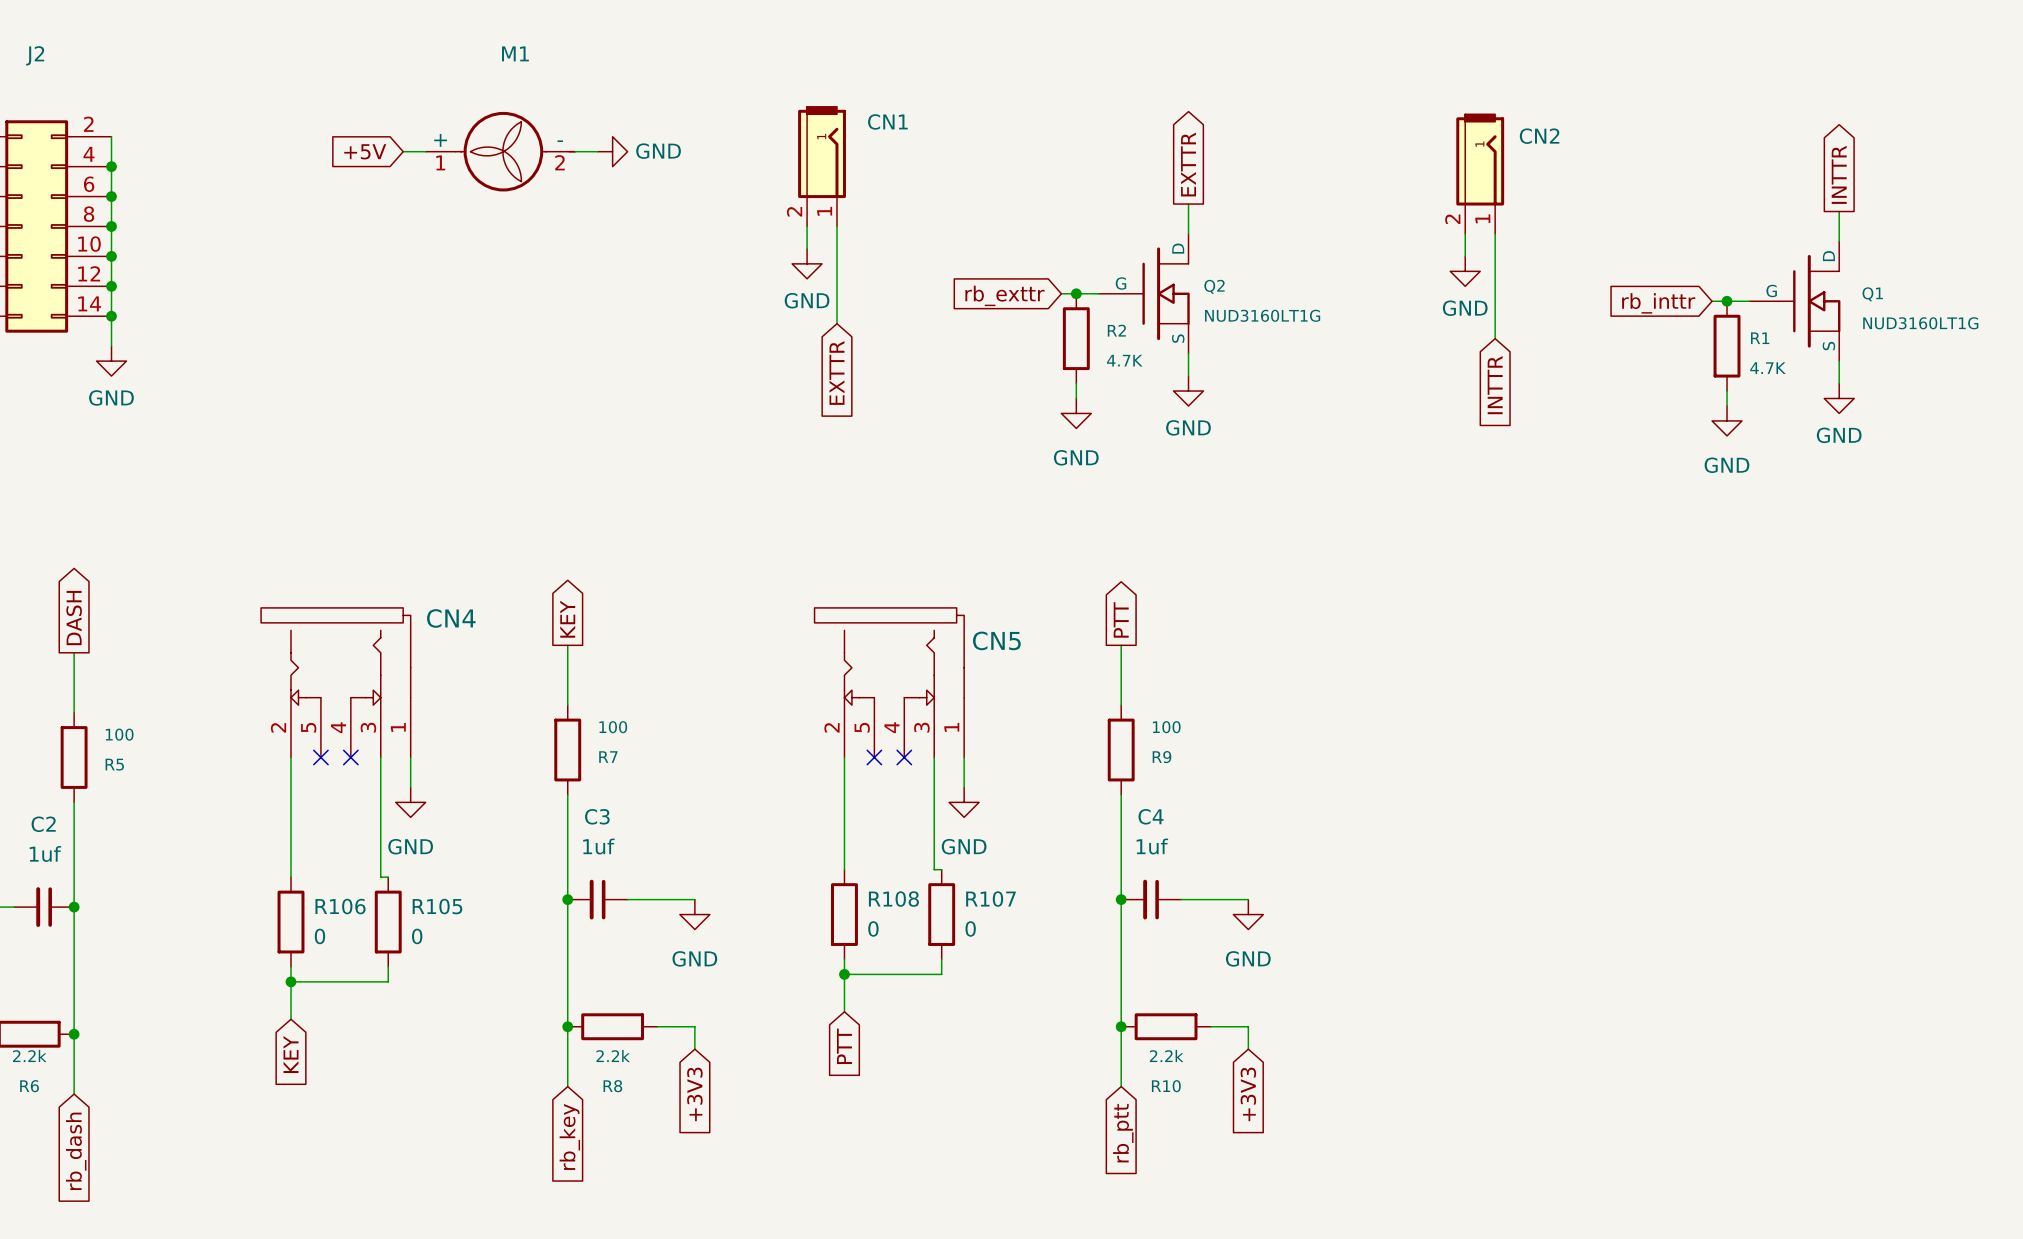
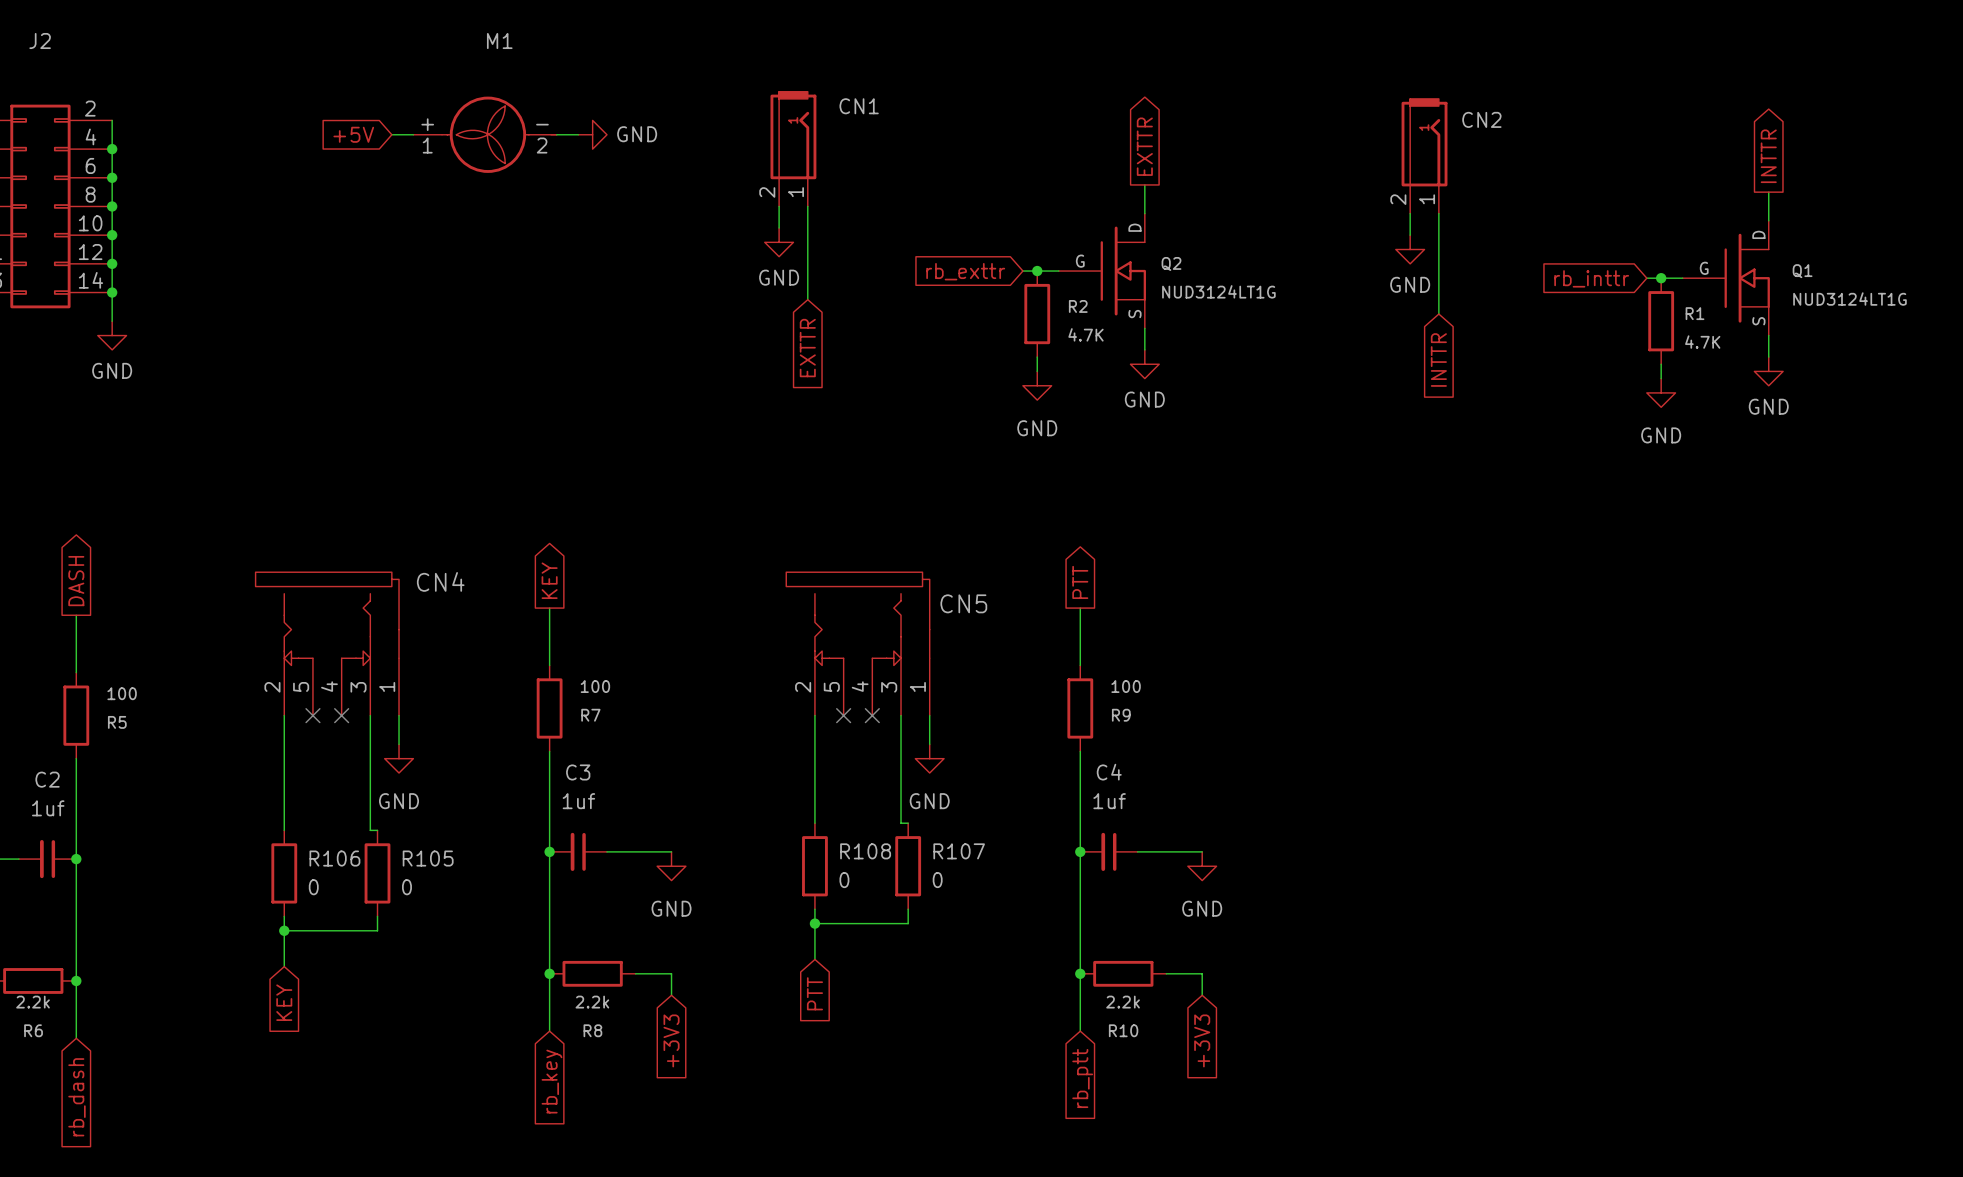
Q2 value: NUD3160LT1G (1262, 315) -> NUD3124LT1G (1218, 291)
Q1 value: NUD3160LT1G (1920, 323) -> NUD3124LT1G (1849, 299)

